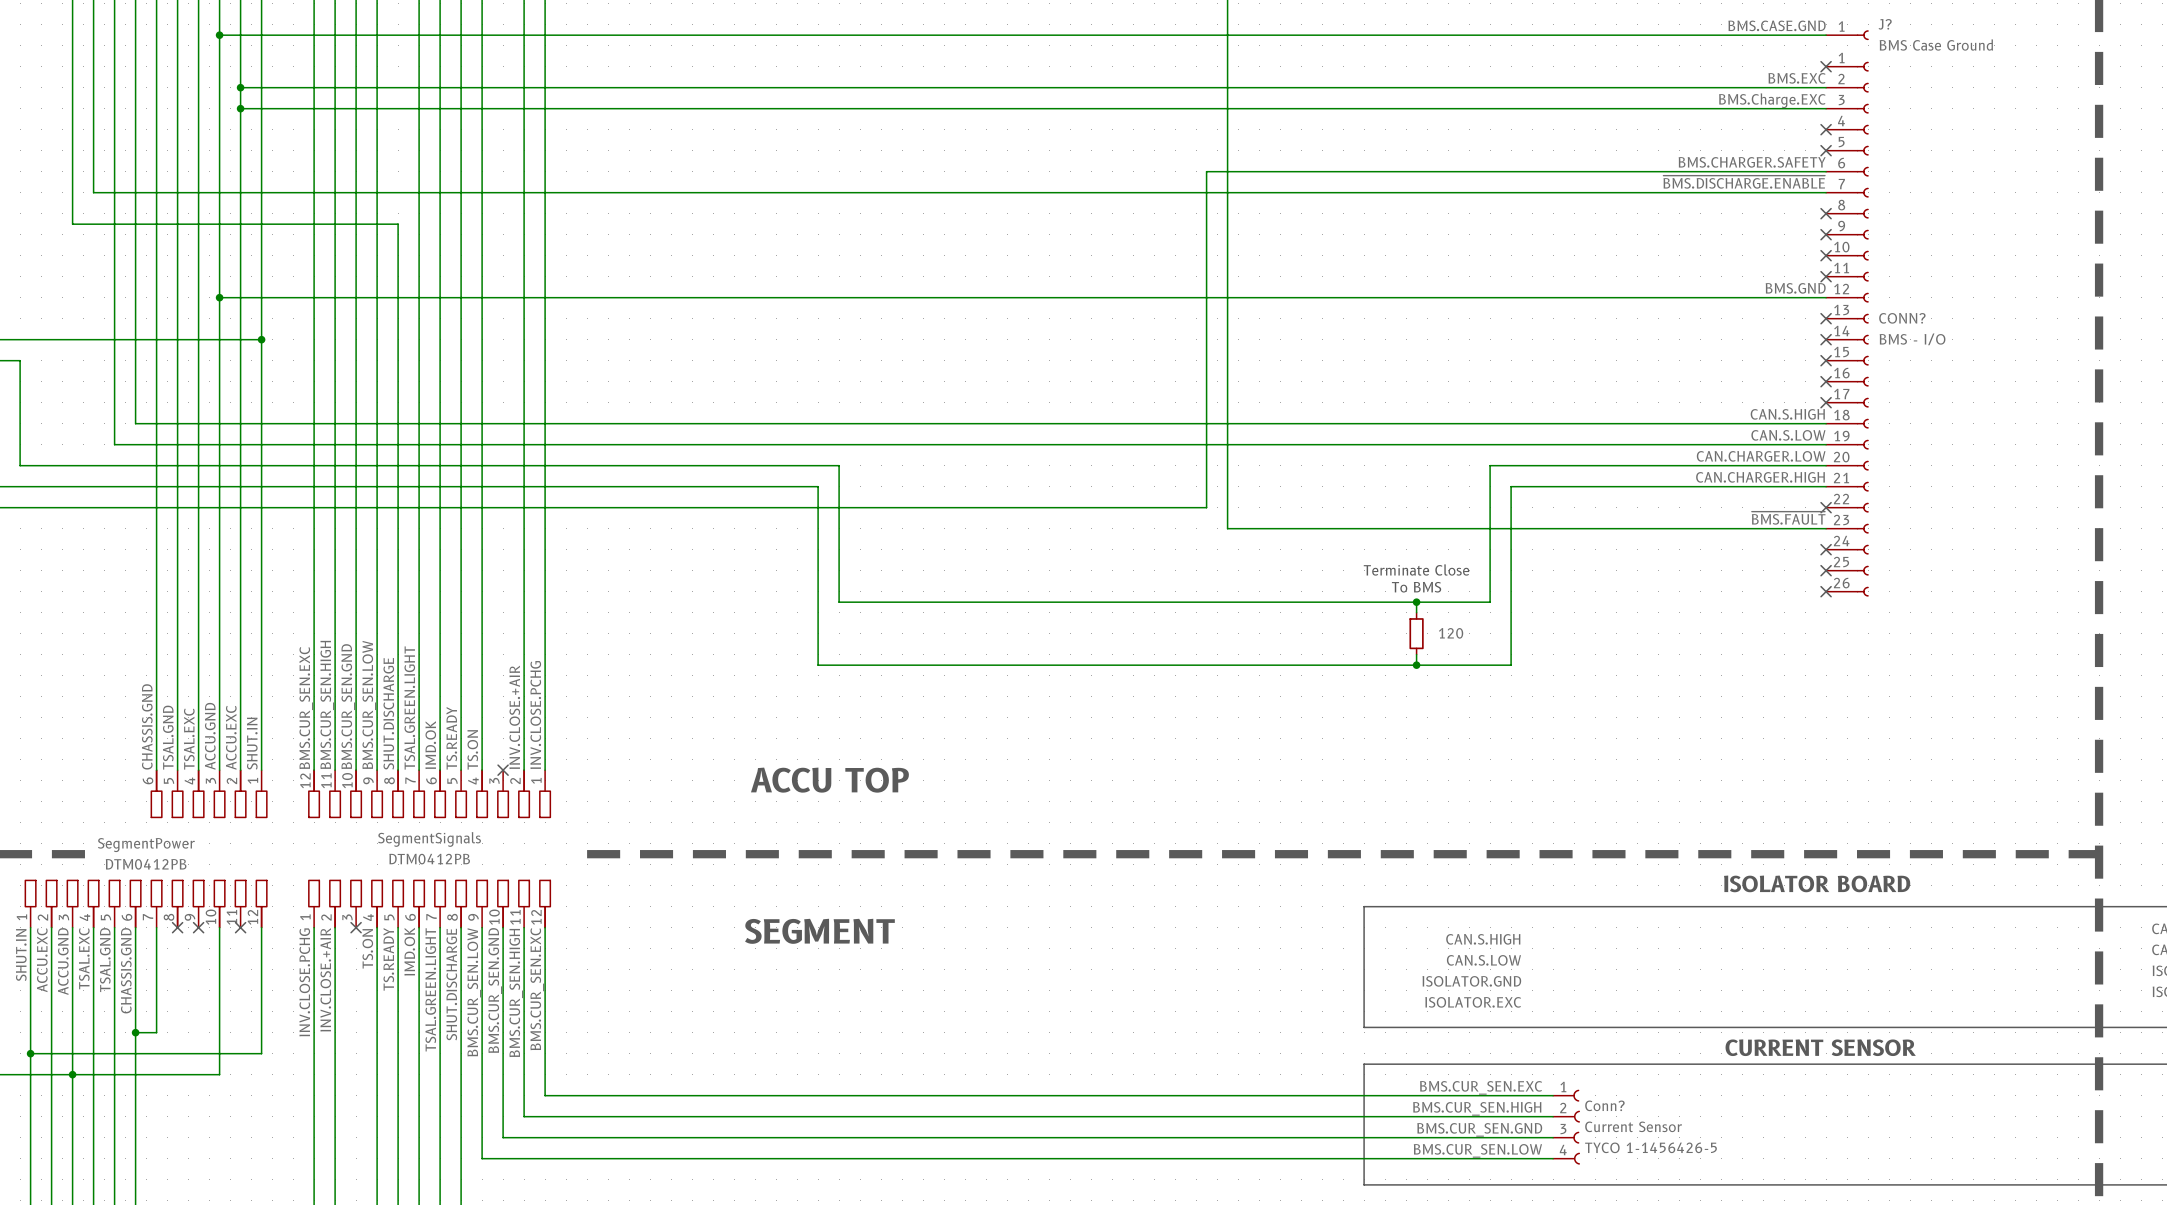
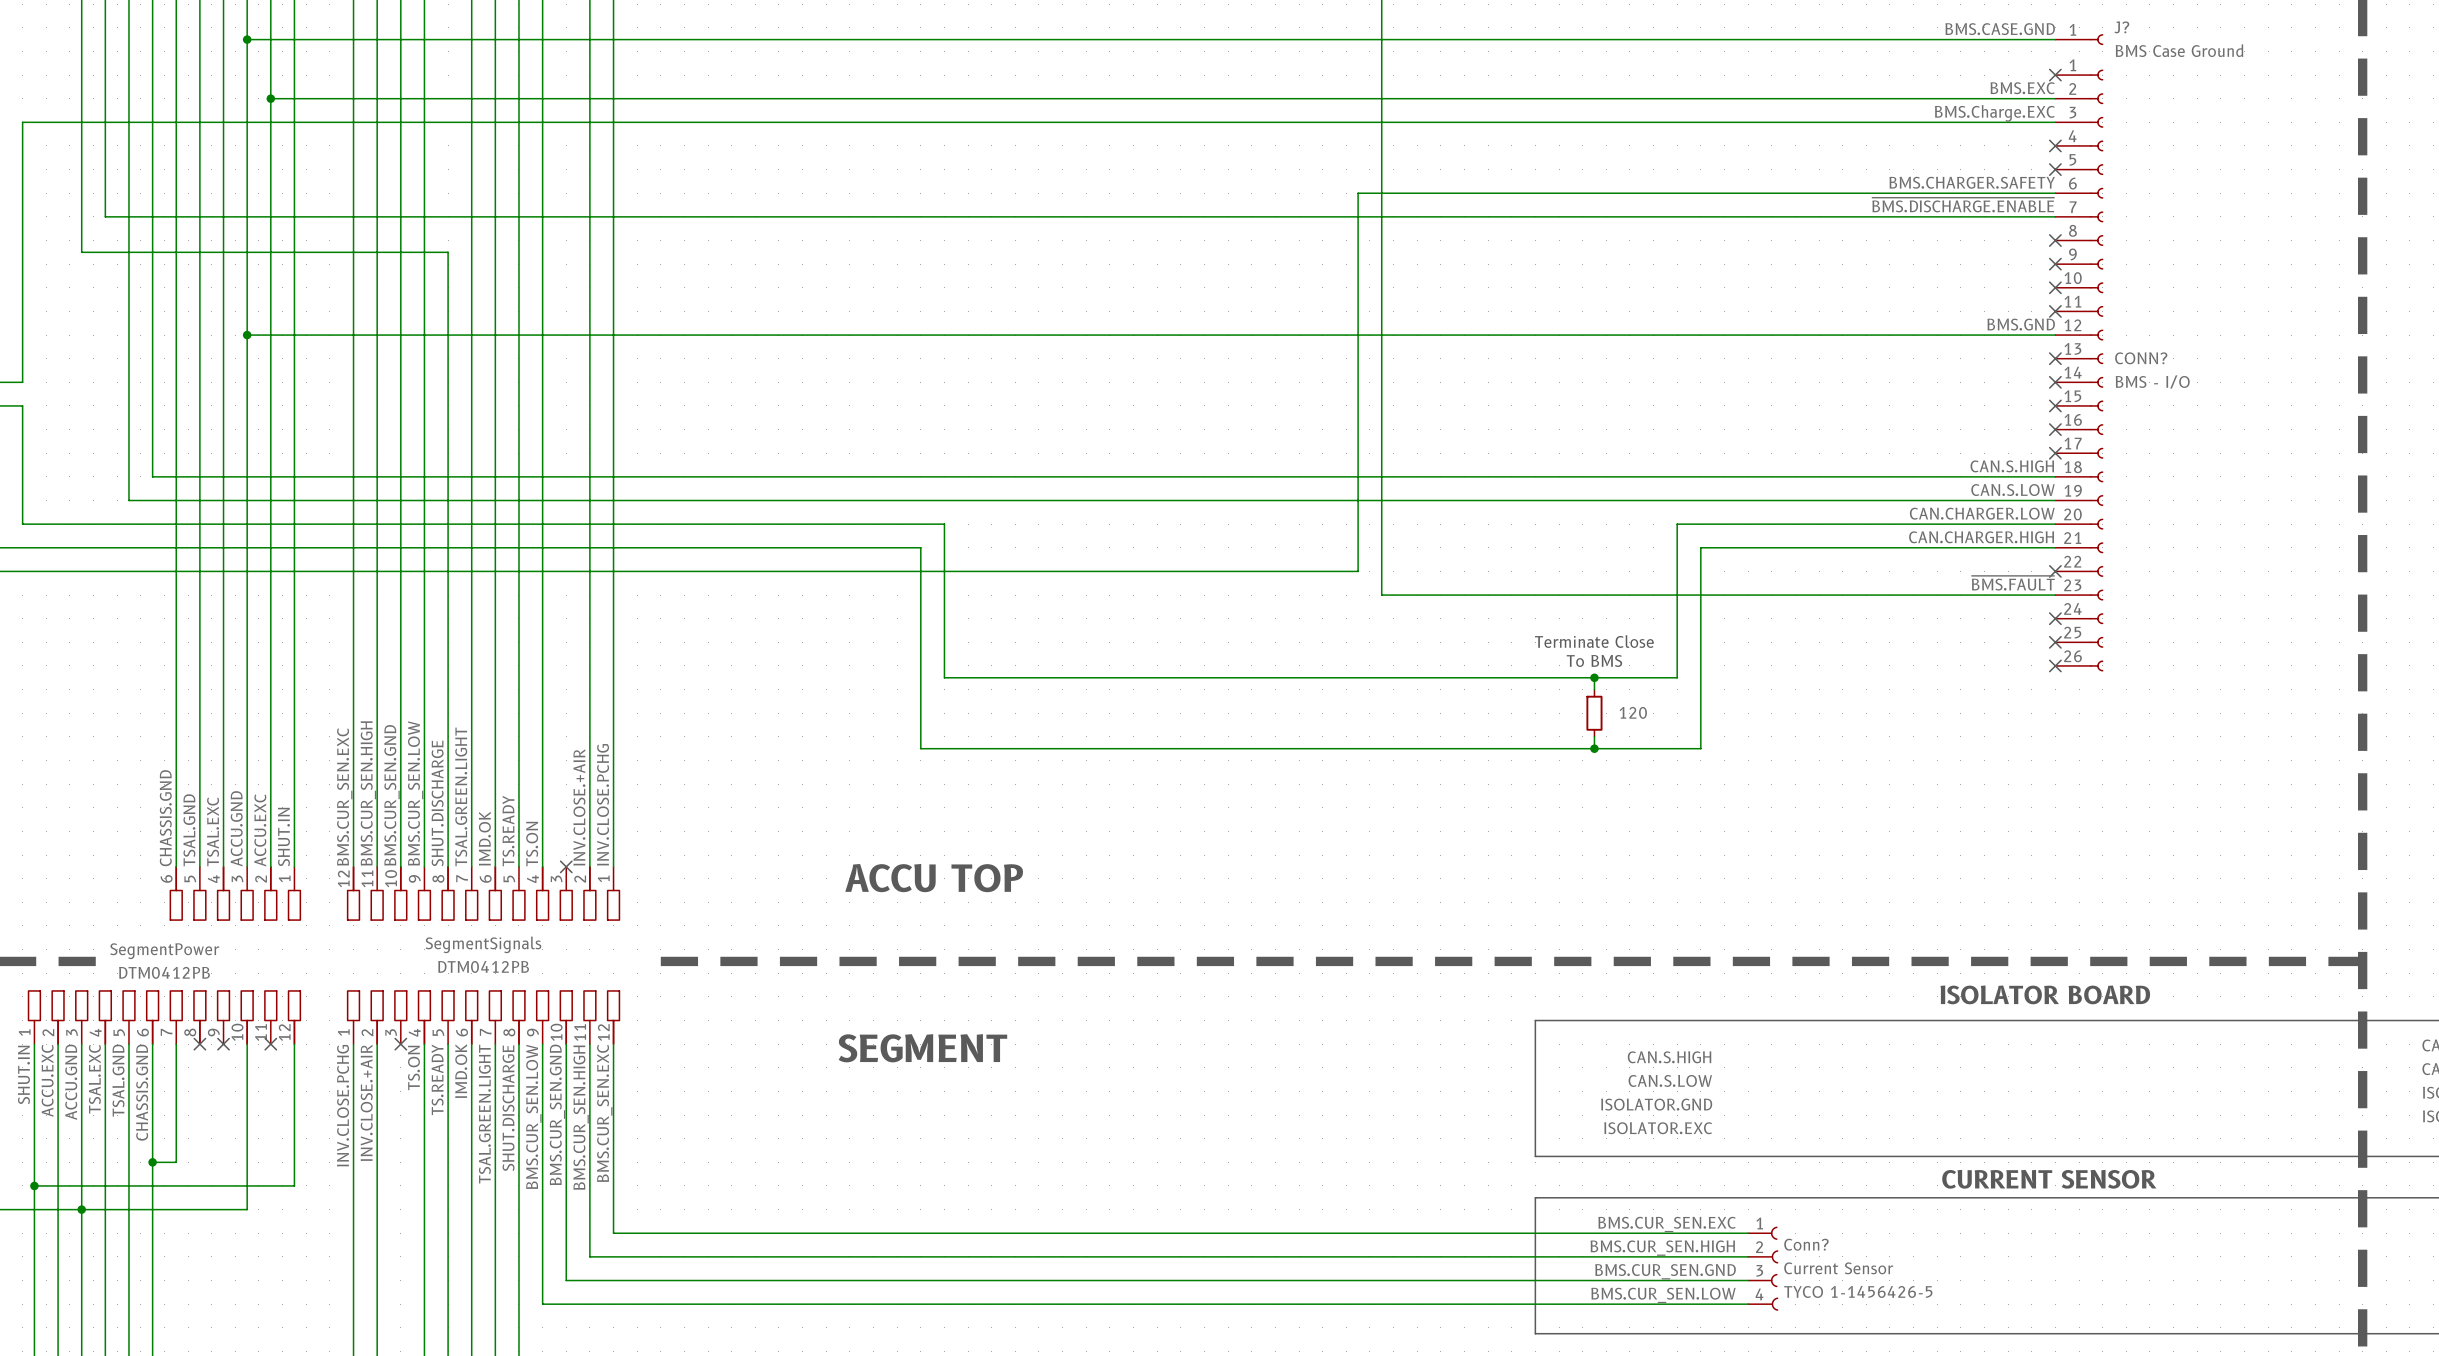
junction: (240, 108) -> none
wire: (20, 339) (261, 339) -> (22, 382) (22, 122) (270, 122)
junction: (261, 339) -> none

